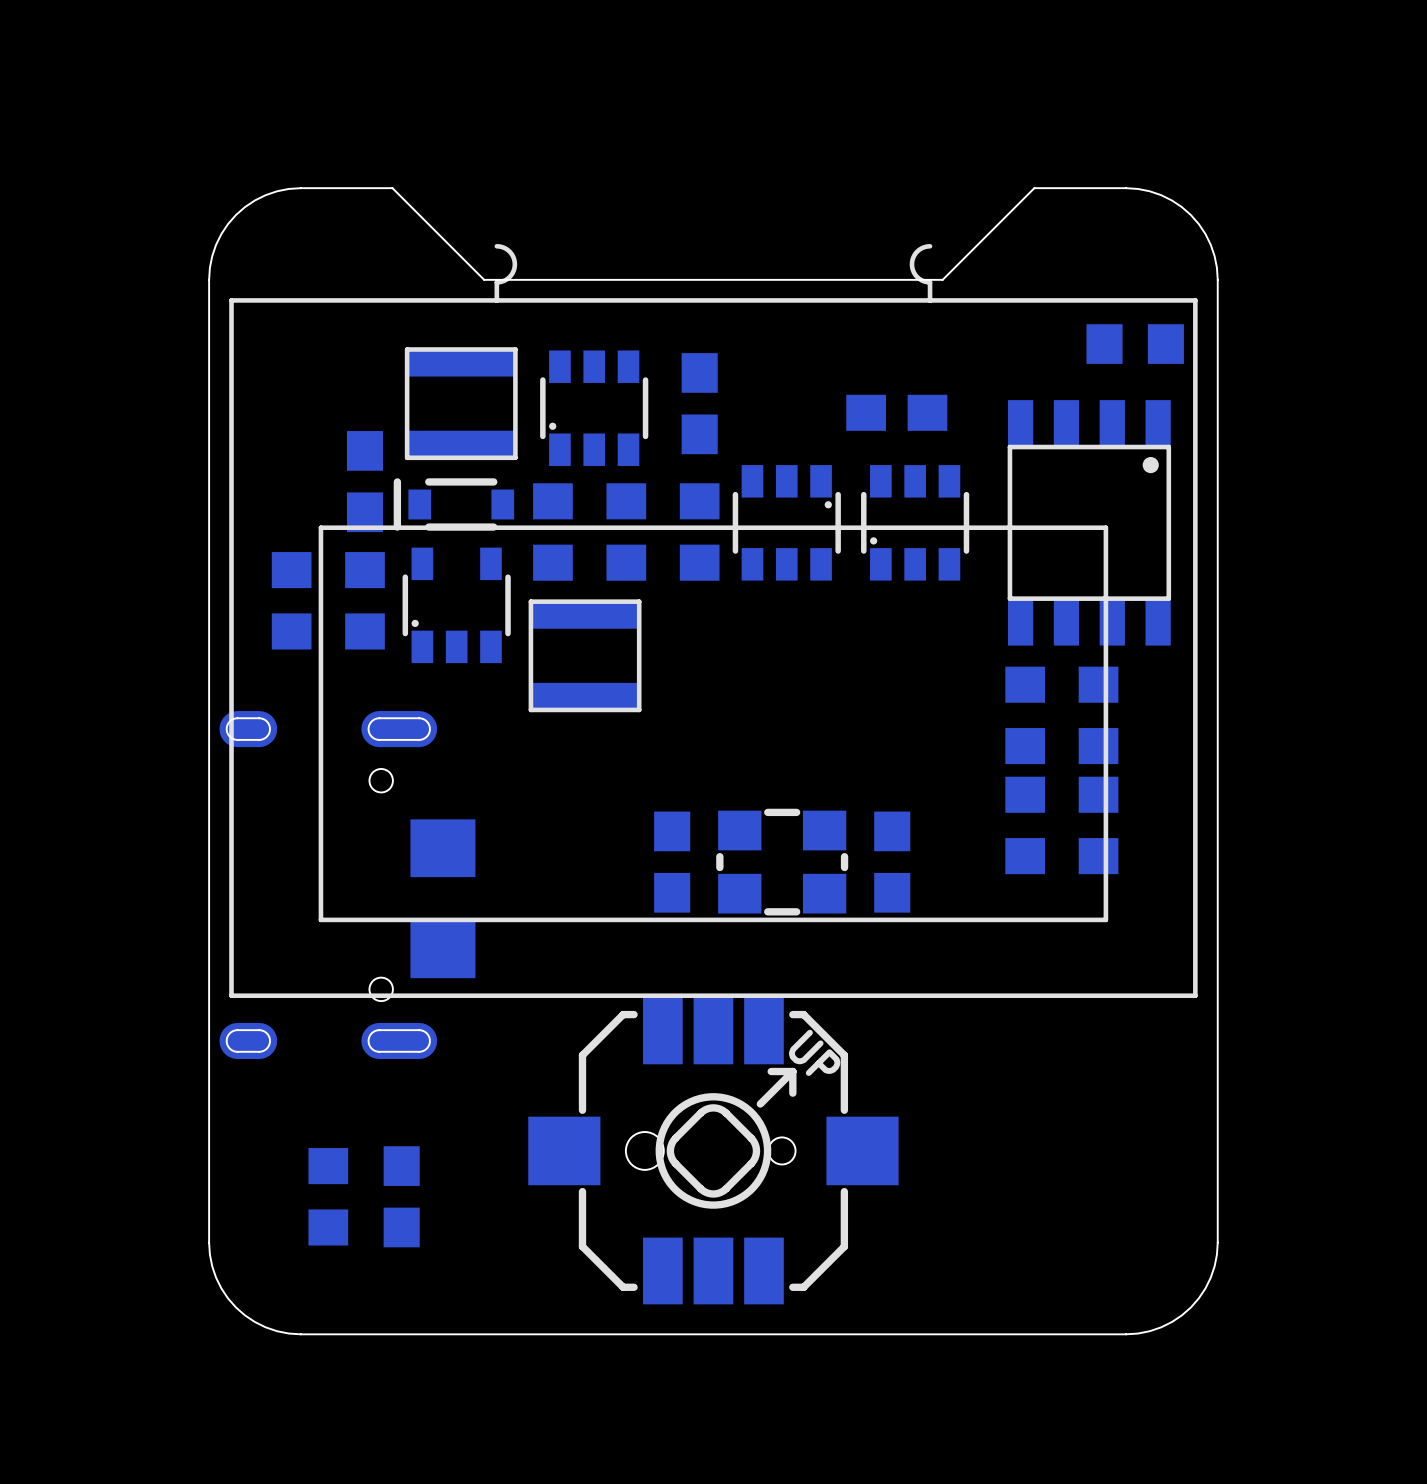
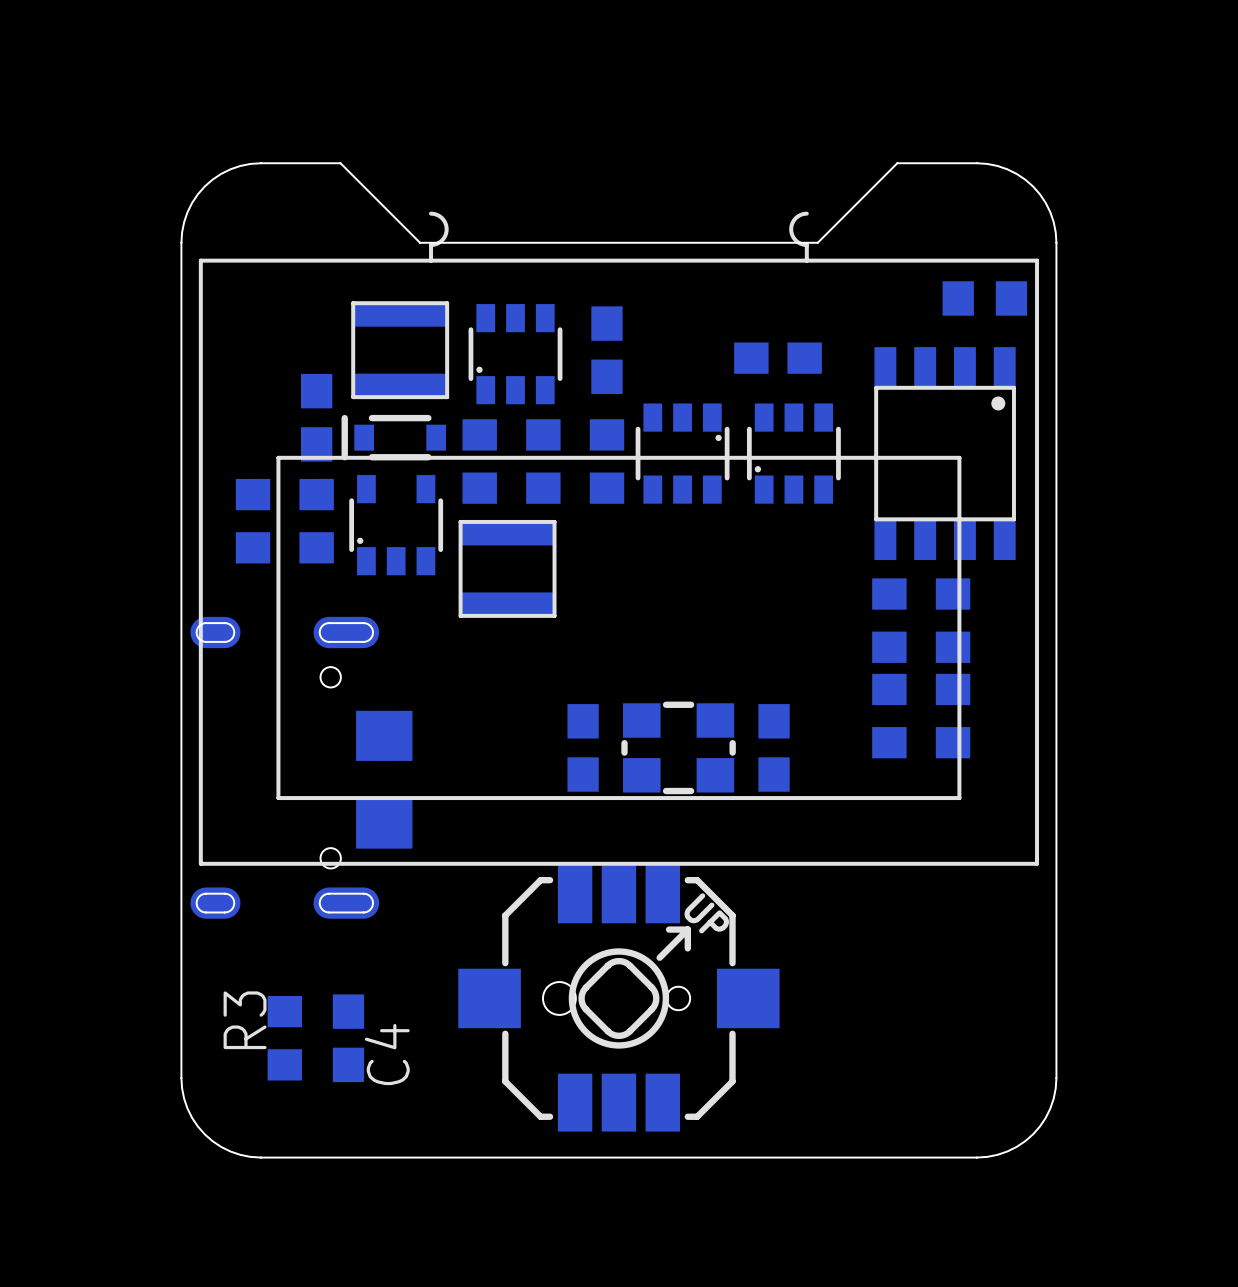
R3 name: none -> R3 (245, 1020)
C4 name: none -> C4 (387, 1054)

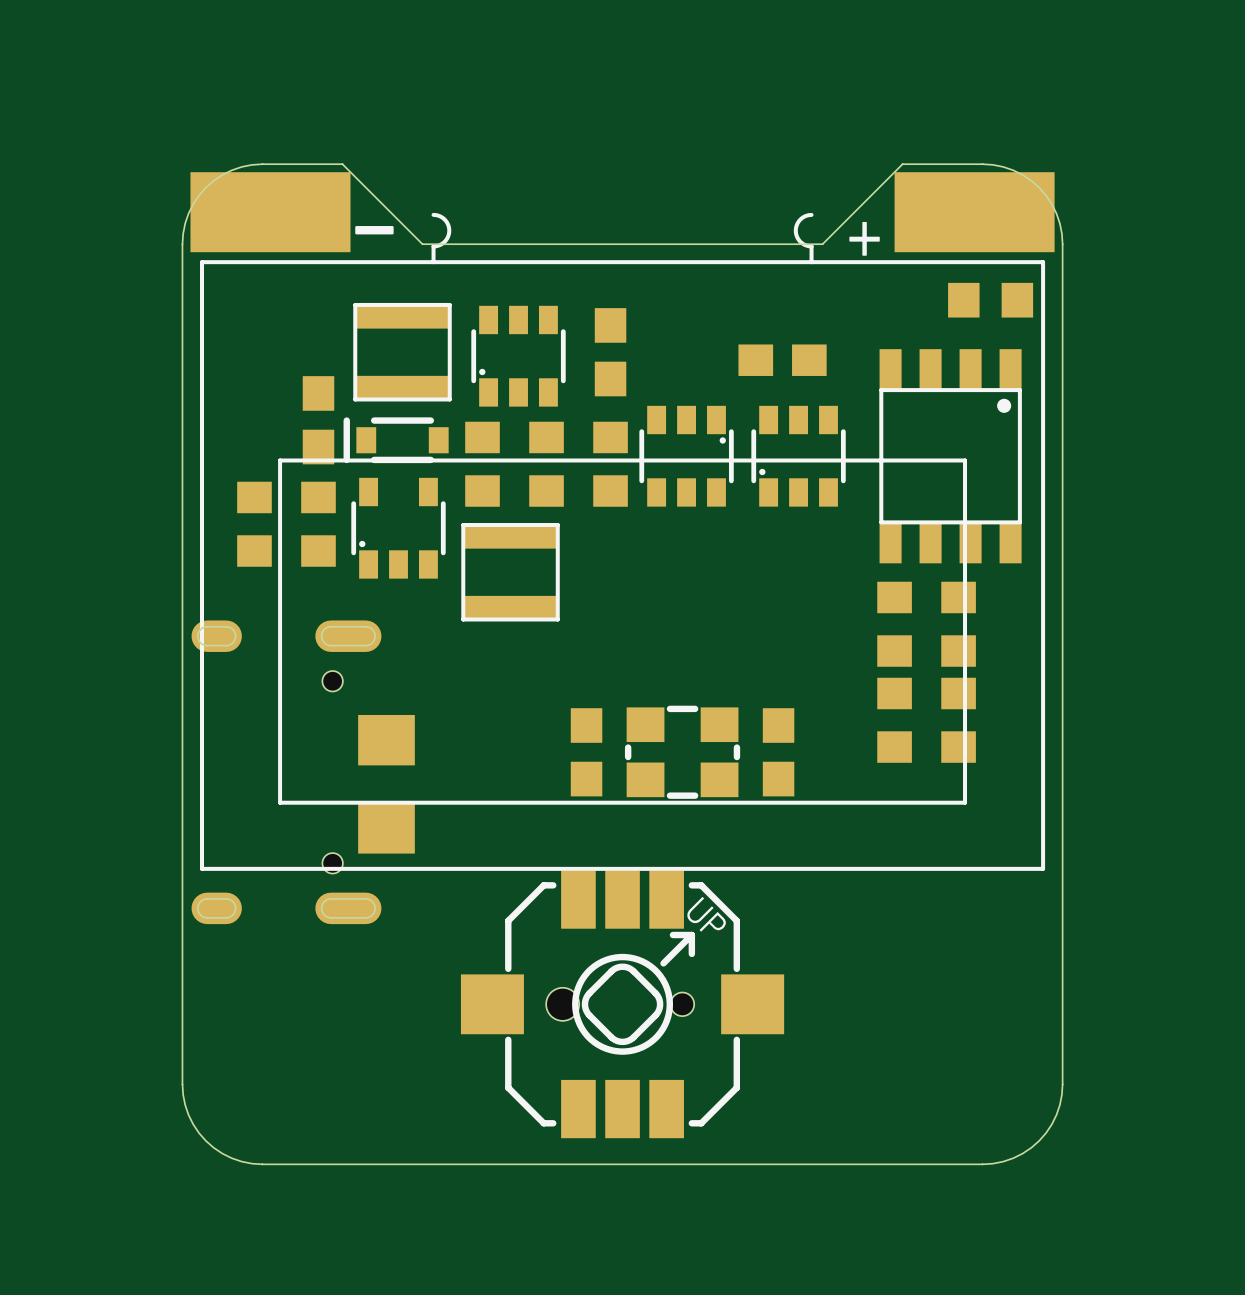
part: none -> (270, 212)
part: none -> (974, 212)
text: none -> - (374, 230)
text: none -> + (864, 238)
R3: (284, 1038) -> none
C4: (348, 1038) -> none

